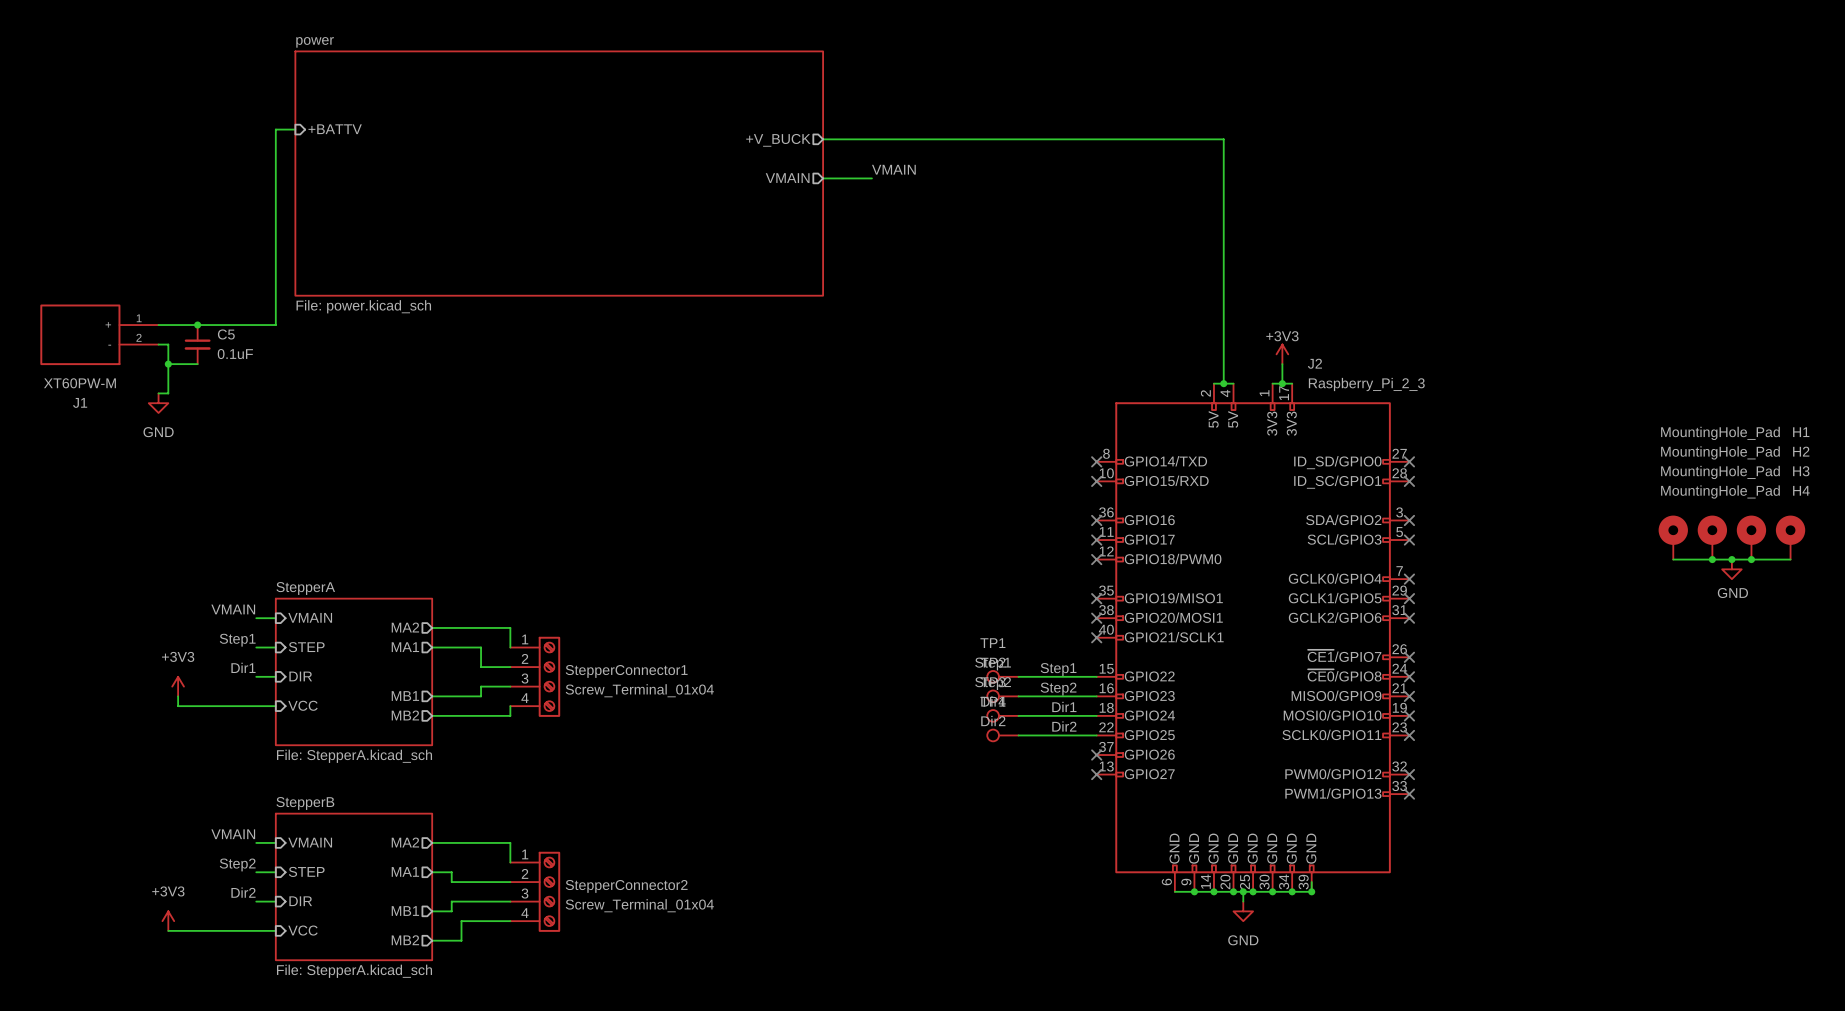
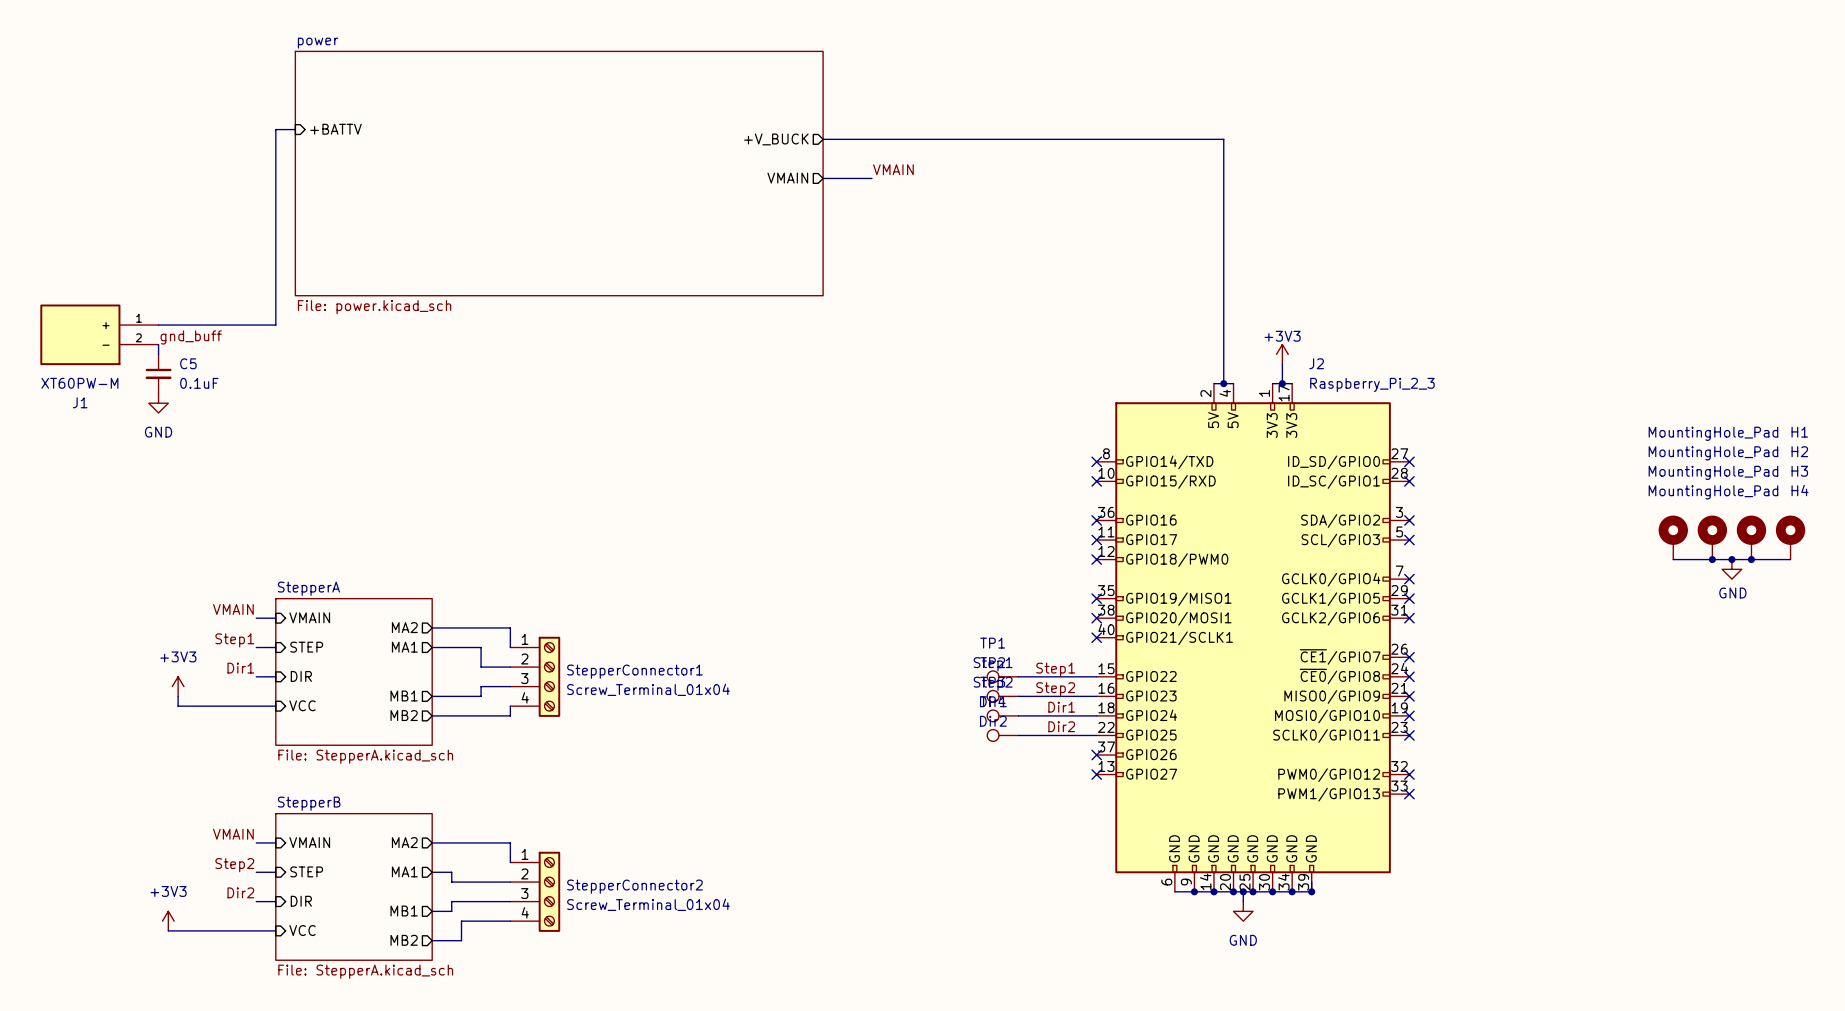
junction: (197, 325) -> none
label: none -> gnd_buff (191, 337)
wire: (158, 344) (168, 344) (168, 393) (158, 393) -> (158, 344) (158, 354)
C5 position: (197, 344) -> (158, 373)
wire: (168, 364) (197, 364) -> none
junction: (168, 364) -> none

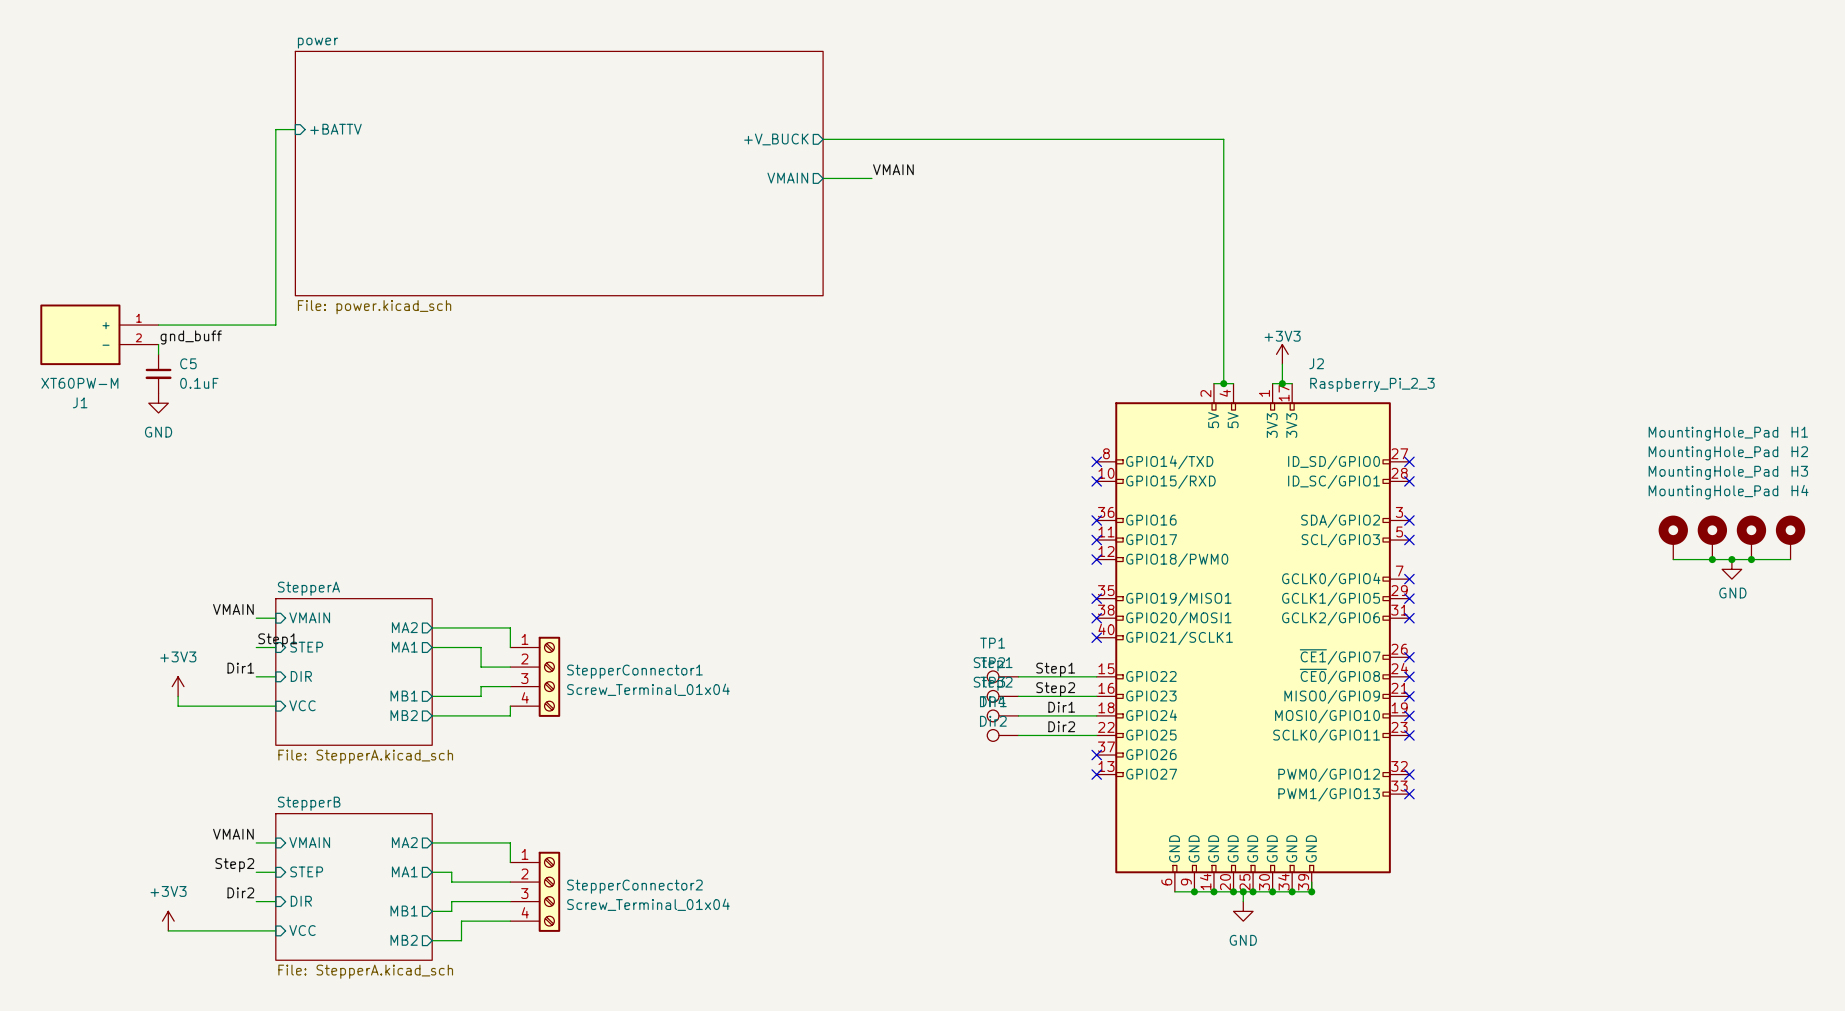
label position: Step1 (234, 640) -> Step1 (277, 640)

